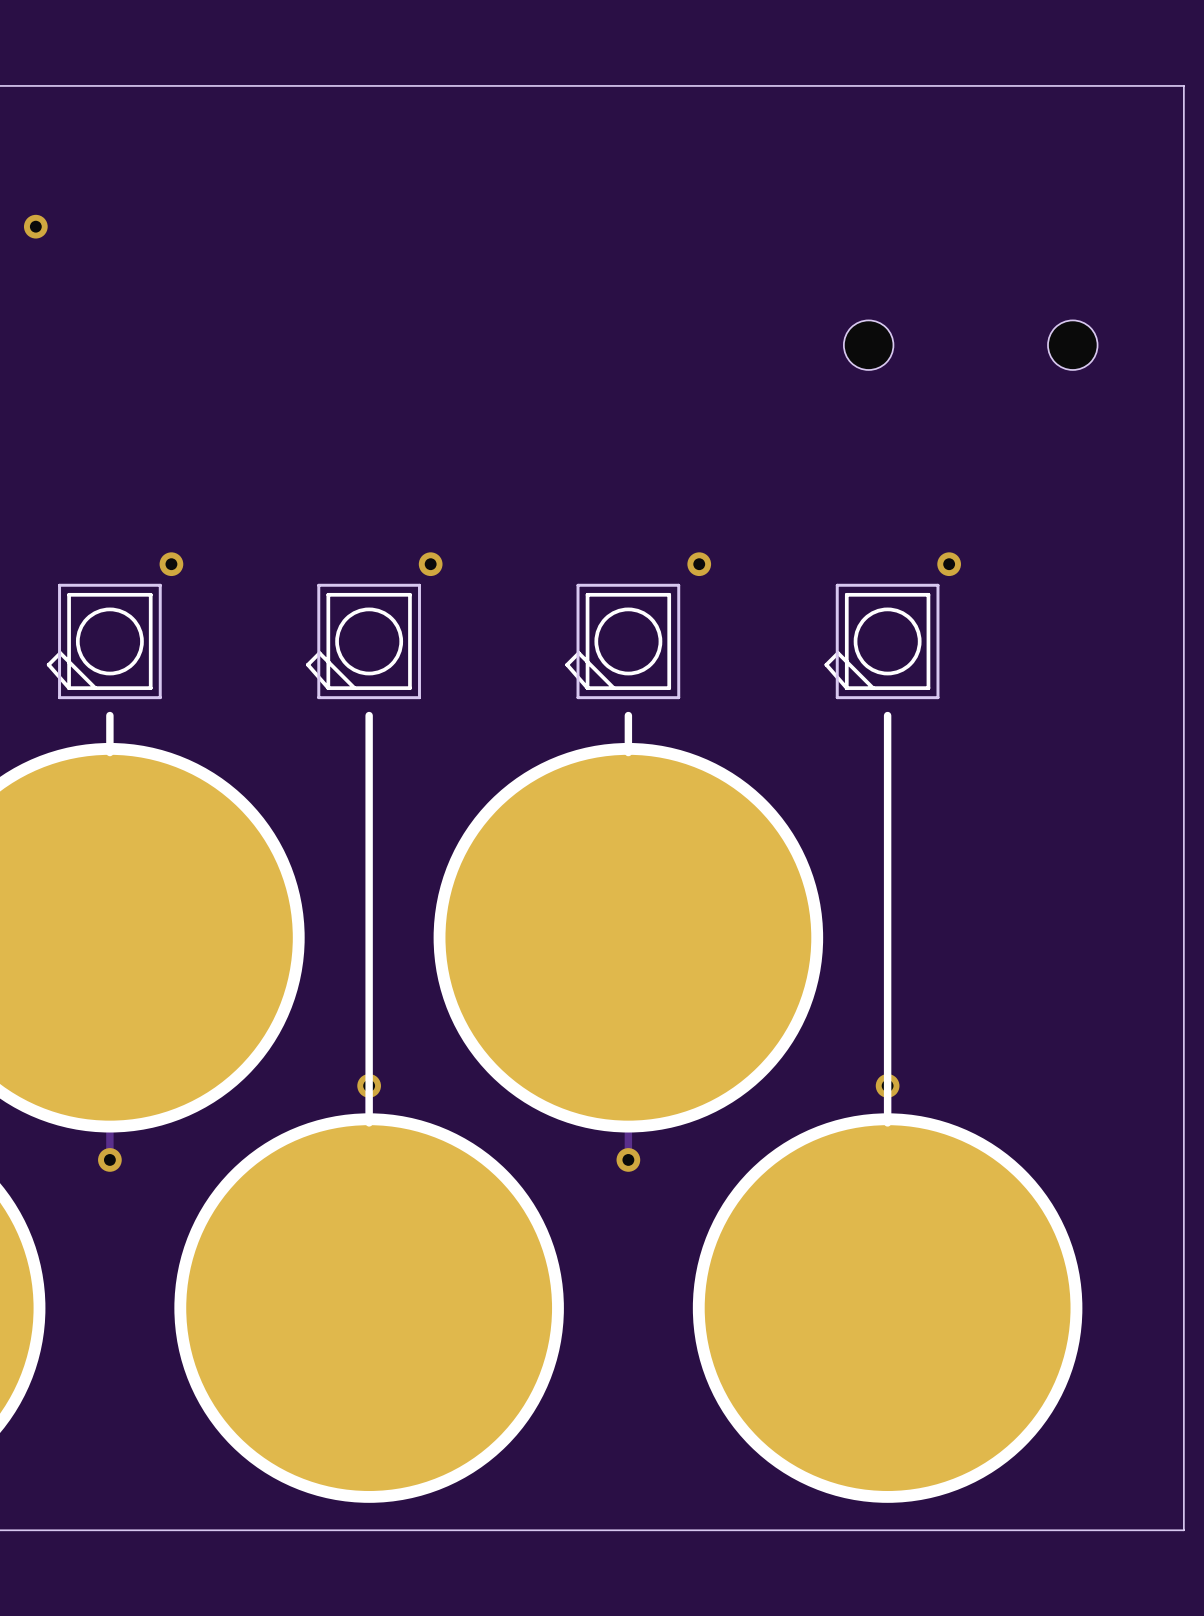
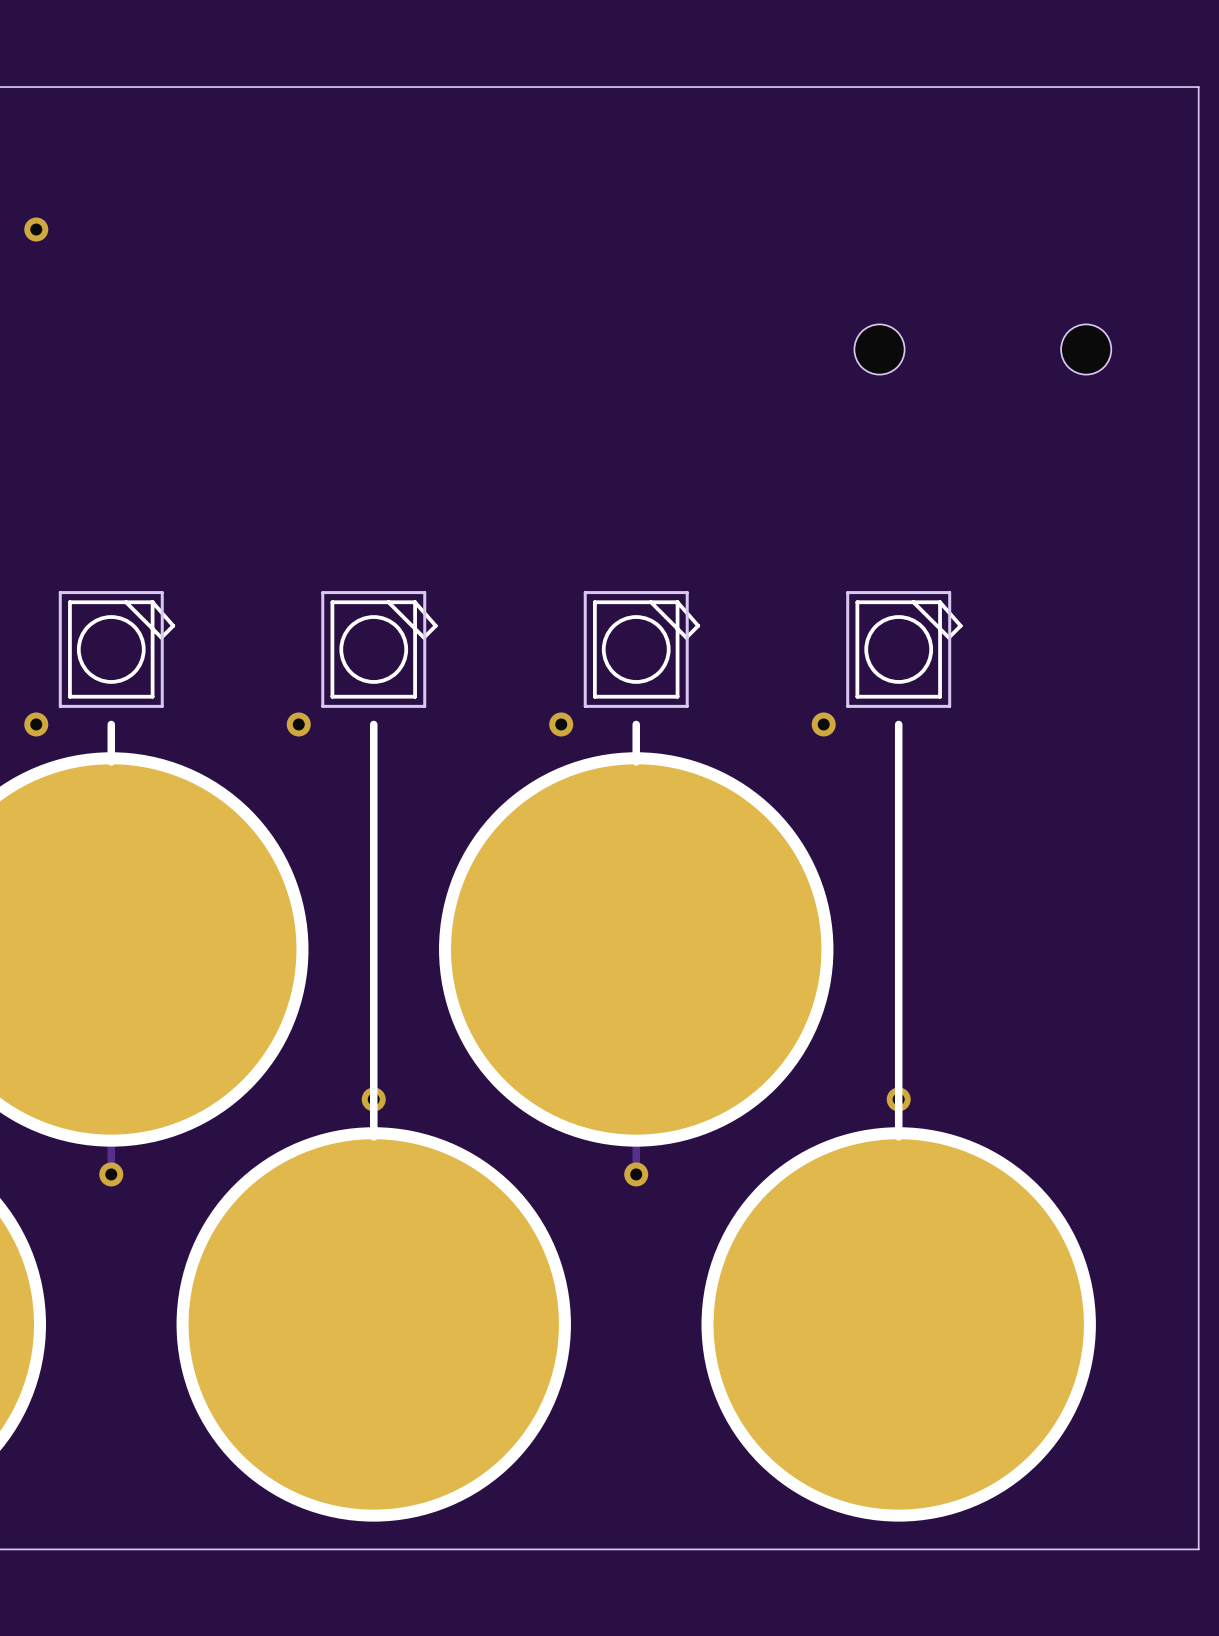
via: (171, 564) -> none
via: (430, 564) -> none
via: (699, 564) -> none
via: (949, 564) -> none
part rotation: 0° (104, 641) -> 180° (116, 649)
part rotation: 0° (363, 641) -> 180° (379, 649)
part rotation: 0° (622, 641) -> 180° (641, 649)
part rotation: 0° (881, 641) -> 180° (904, 649)
via: none -> (36, 724)
via: none -> (298, 724)
via: none -> (561, 724)
via: none -> (823, 724)

